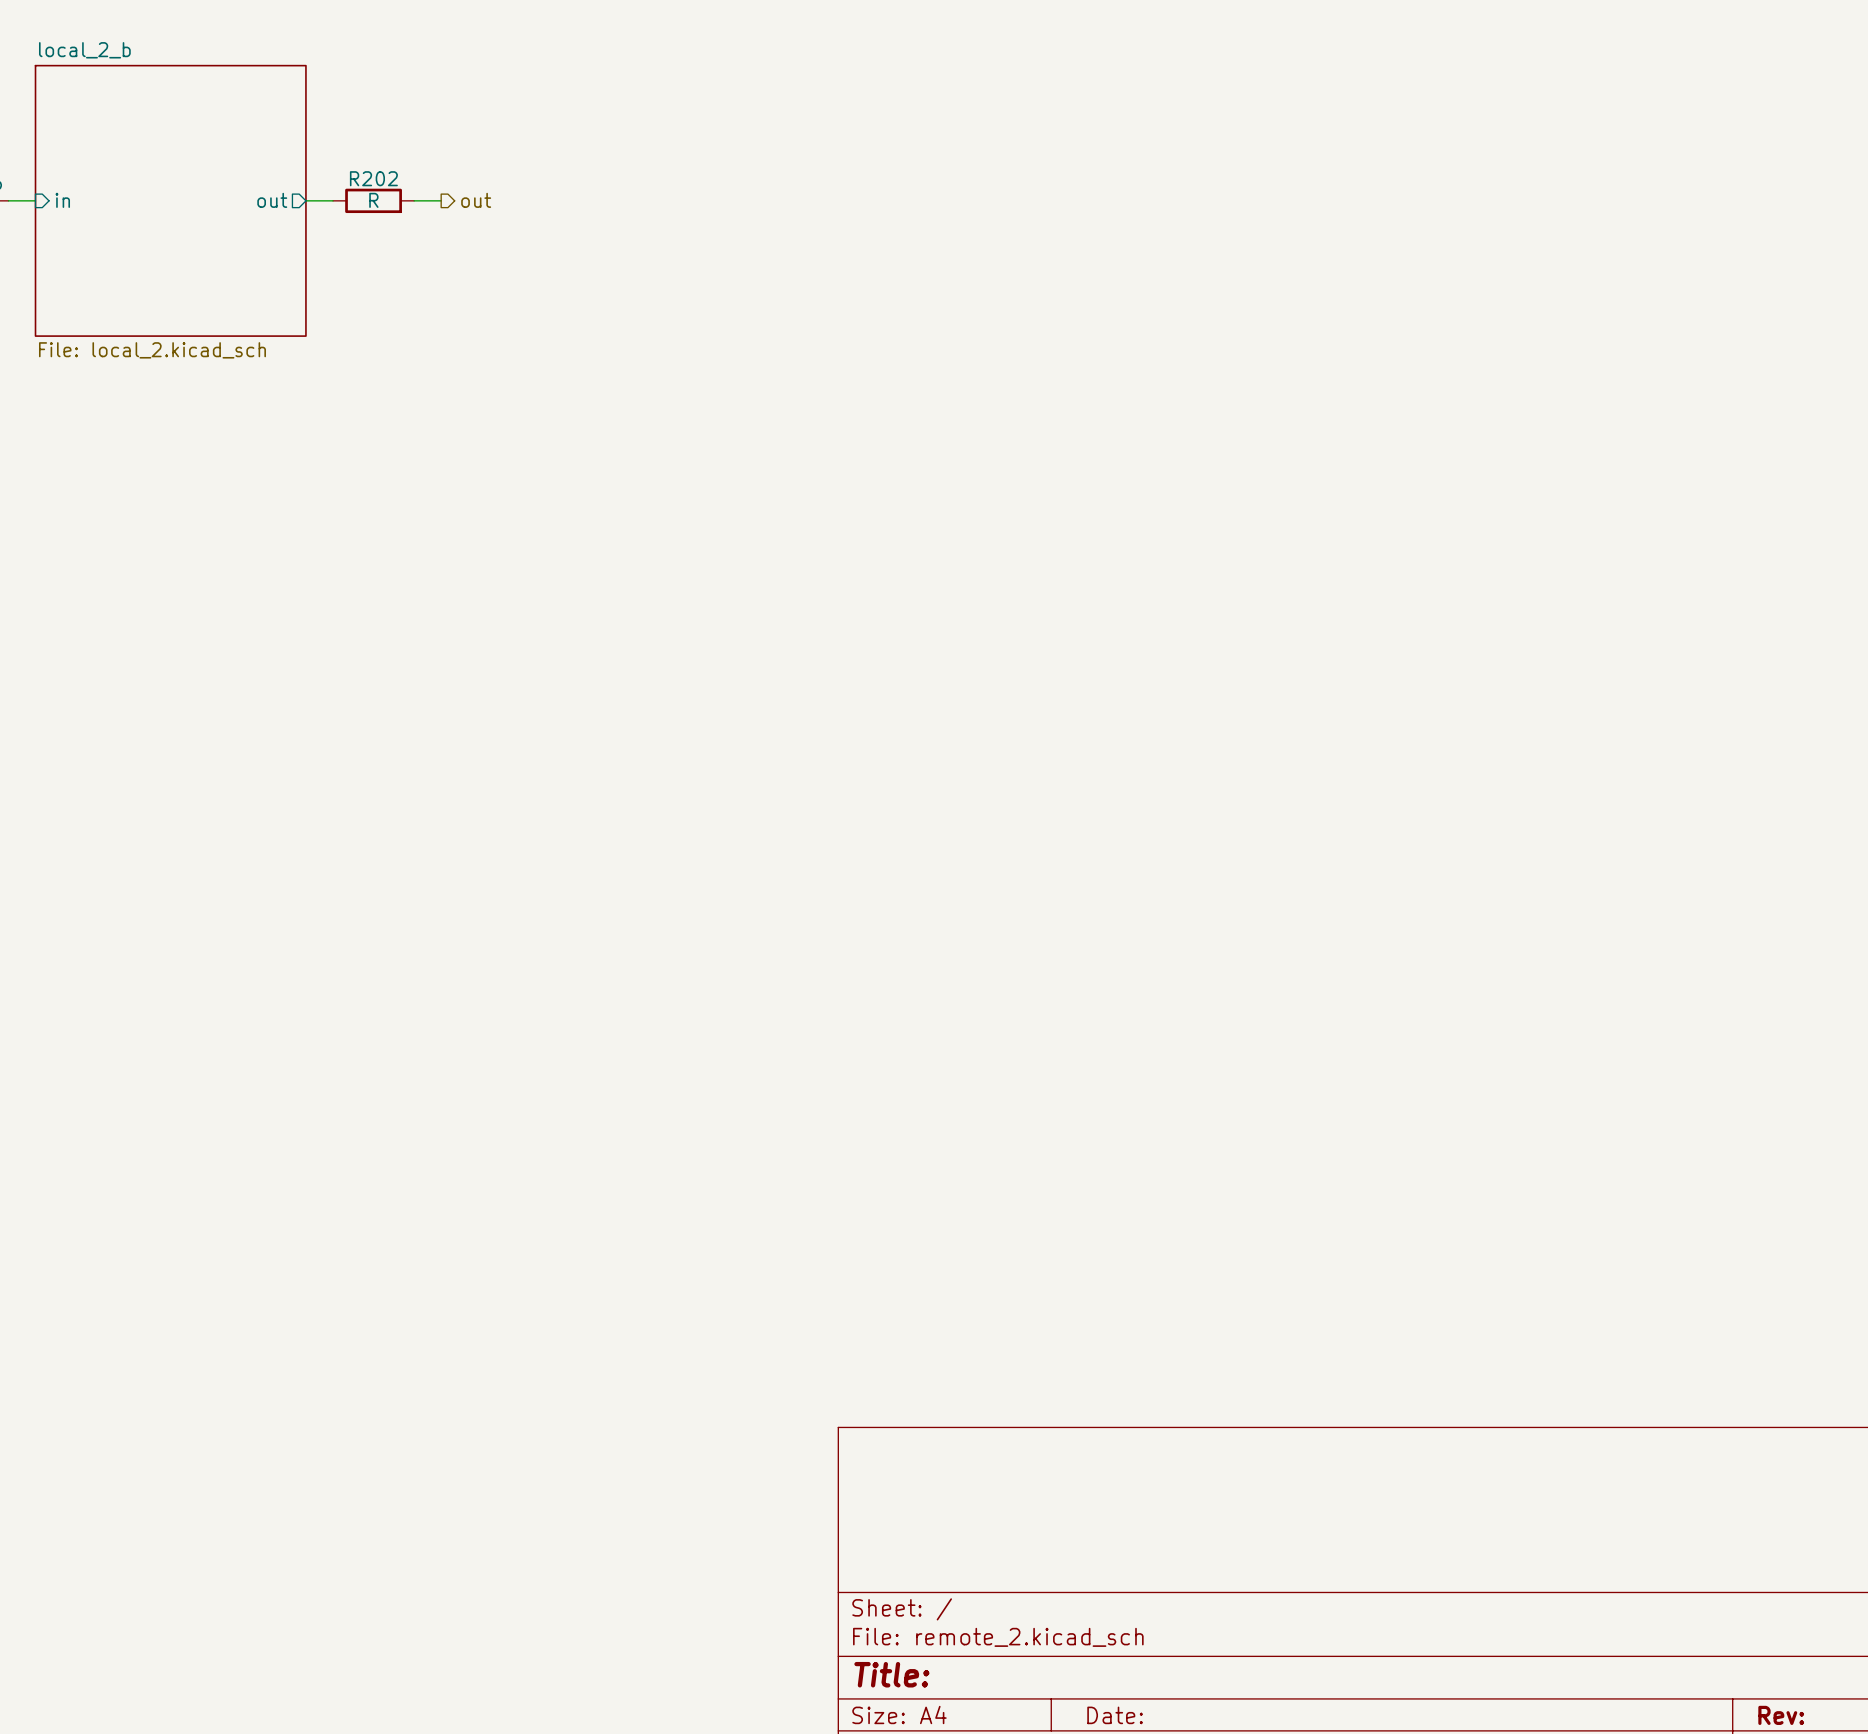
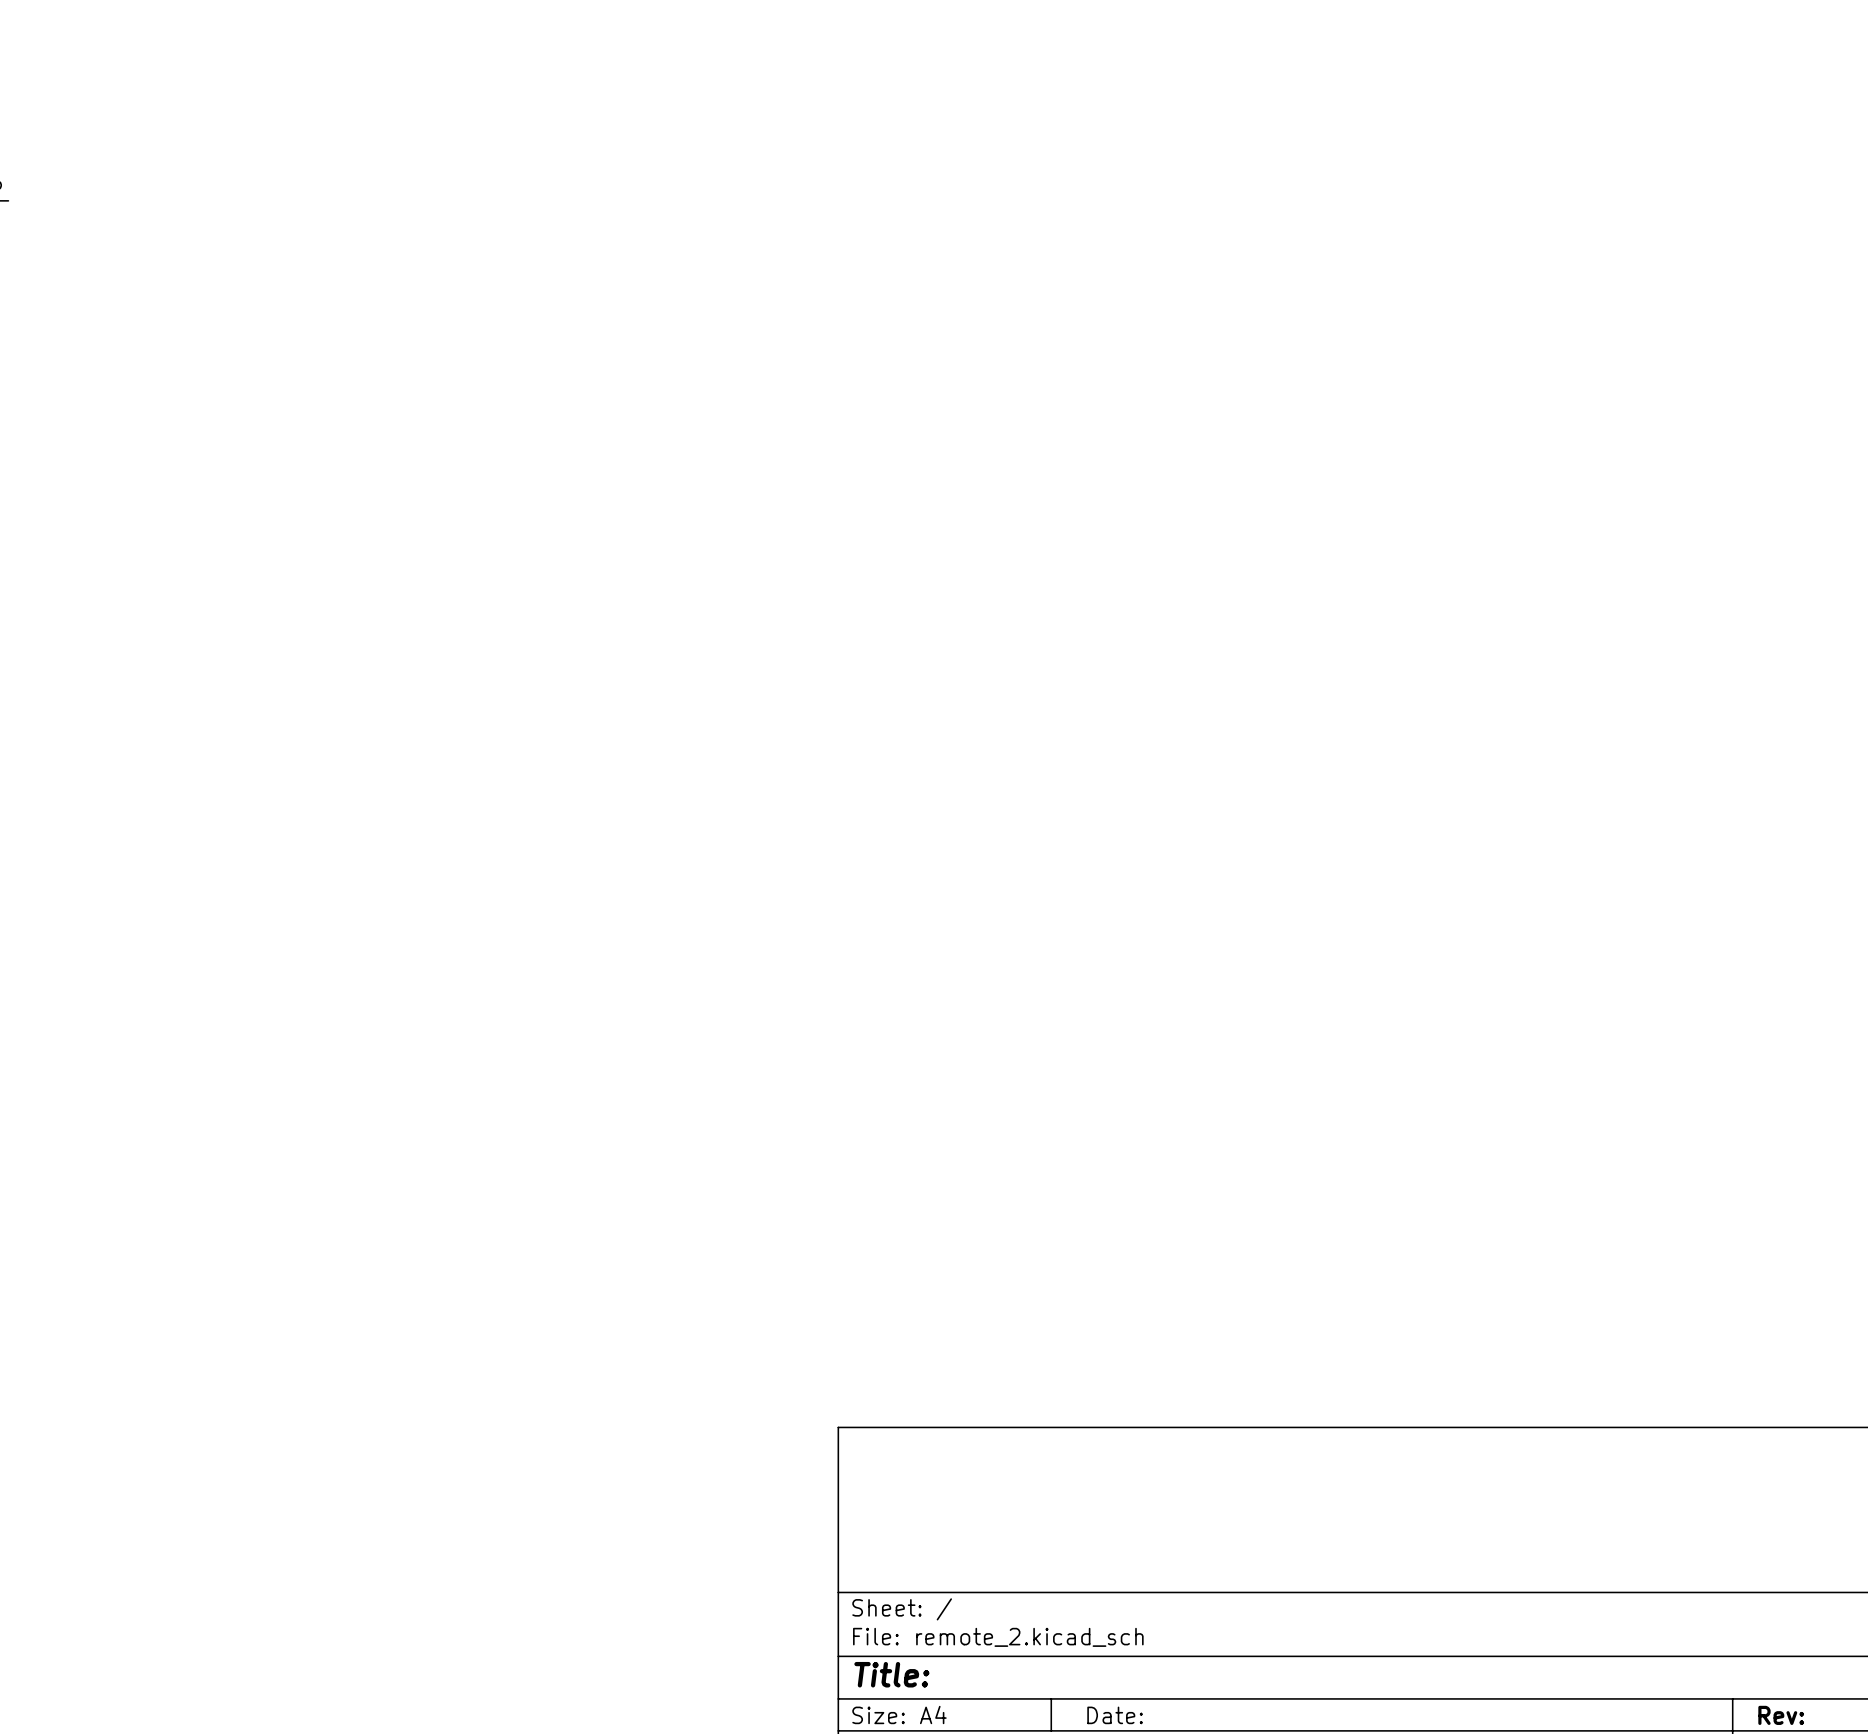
wire: (8, 200) (35, 200) -> none
sheet pin: in (62, 200) -> none
sheet local_2_b: File: local_2.kicad_sch (170, 200) -> none
sheet pin: out (272, 200) -> none
wire: (305, 200) (333, 200) -> none
R202: R (373, 200) -> none
wire: (414, 200) (441, 200) -> none
hierarchical label: out (476, 200) -> none

